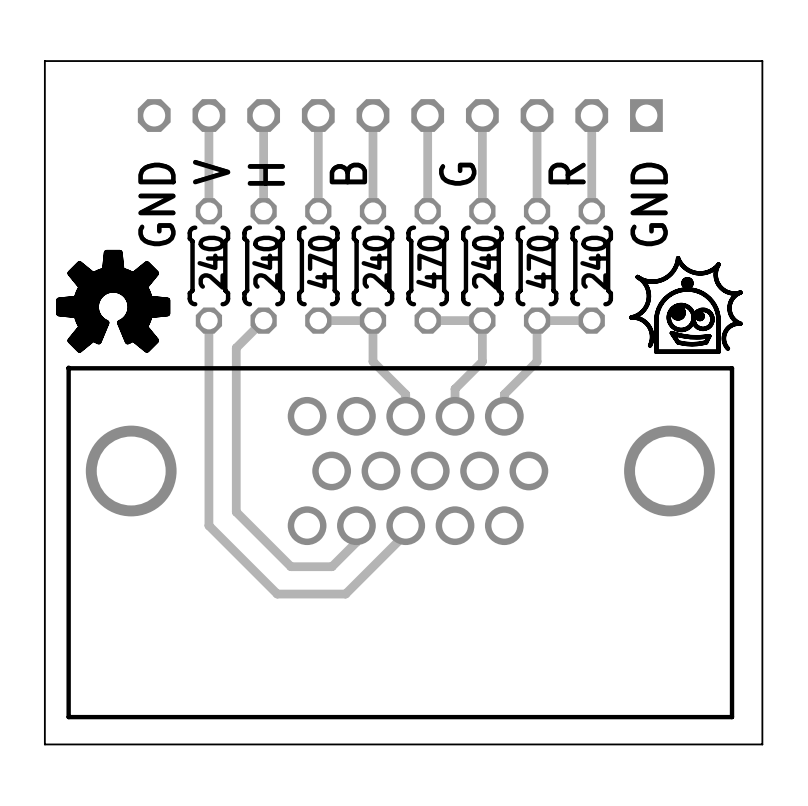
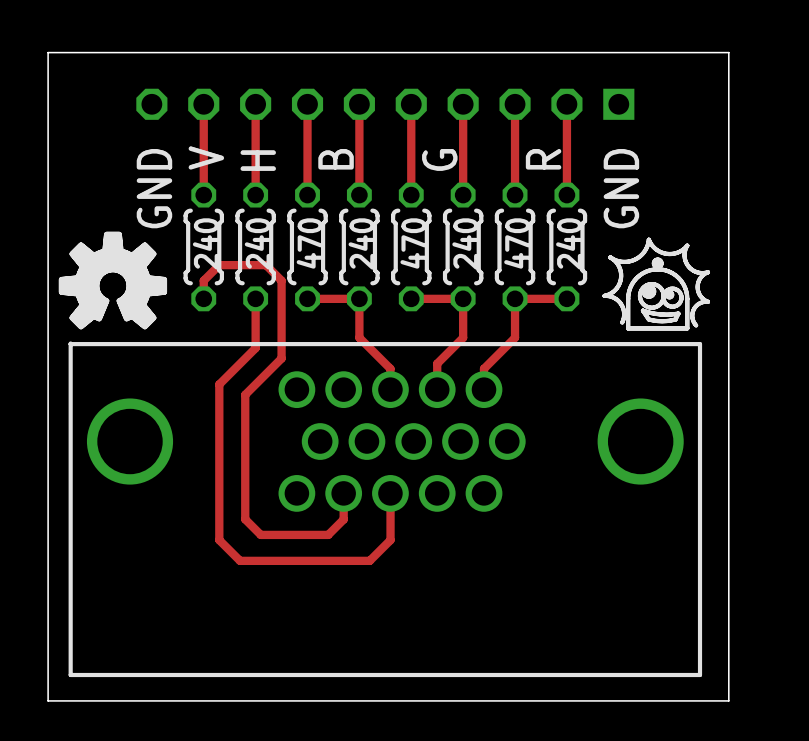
track: (208, 320) (208, 525) (277, 594) (345, 594) (405, 533) -> (203, 298) (203, 280) (219, 265) (266, 265) (281, 280) (281, 358) (245, 394) (245, 519) (260, 534) (328, 534) (343, 519) (343, 509)
track: (263, 320) (236, 347) (236, 512) (290, 566) (331, 566) (356, 542) -> (255, 298) (255, 348) (219, 384) (219, 540) (240, 560) (369, 560) (390, 540) (390, 501)

